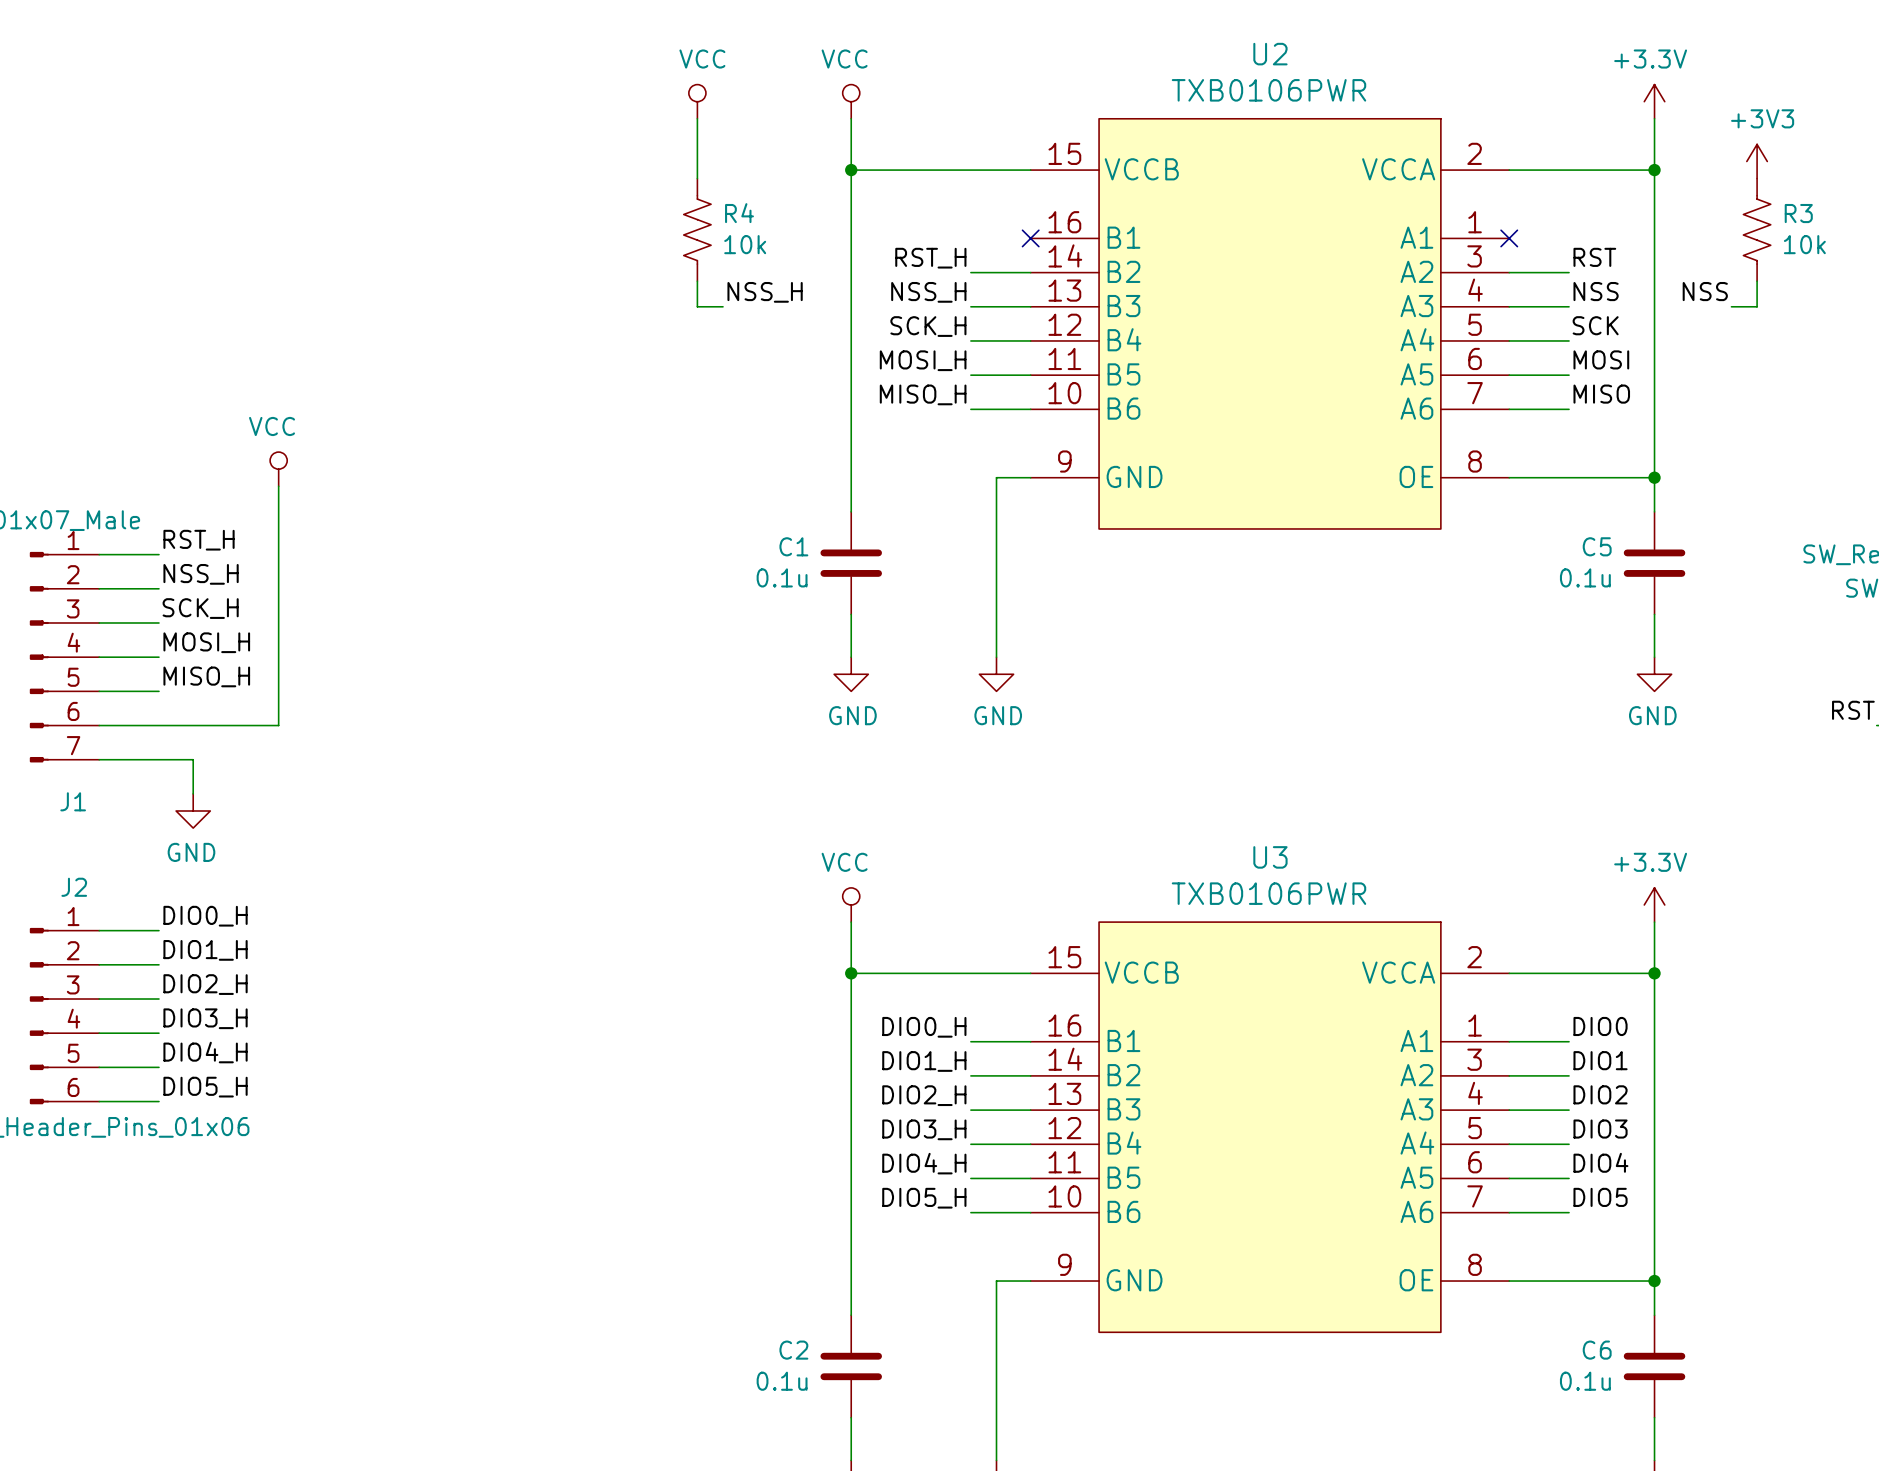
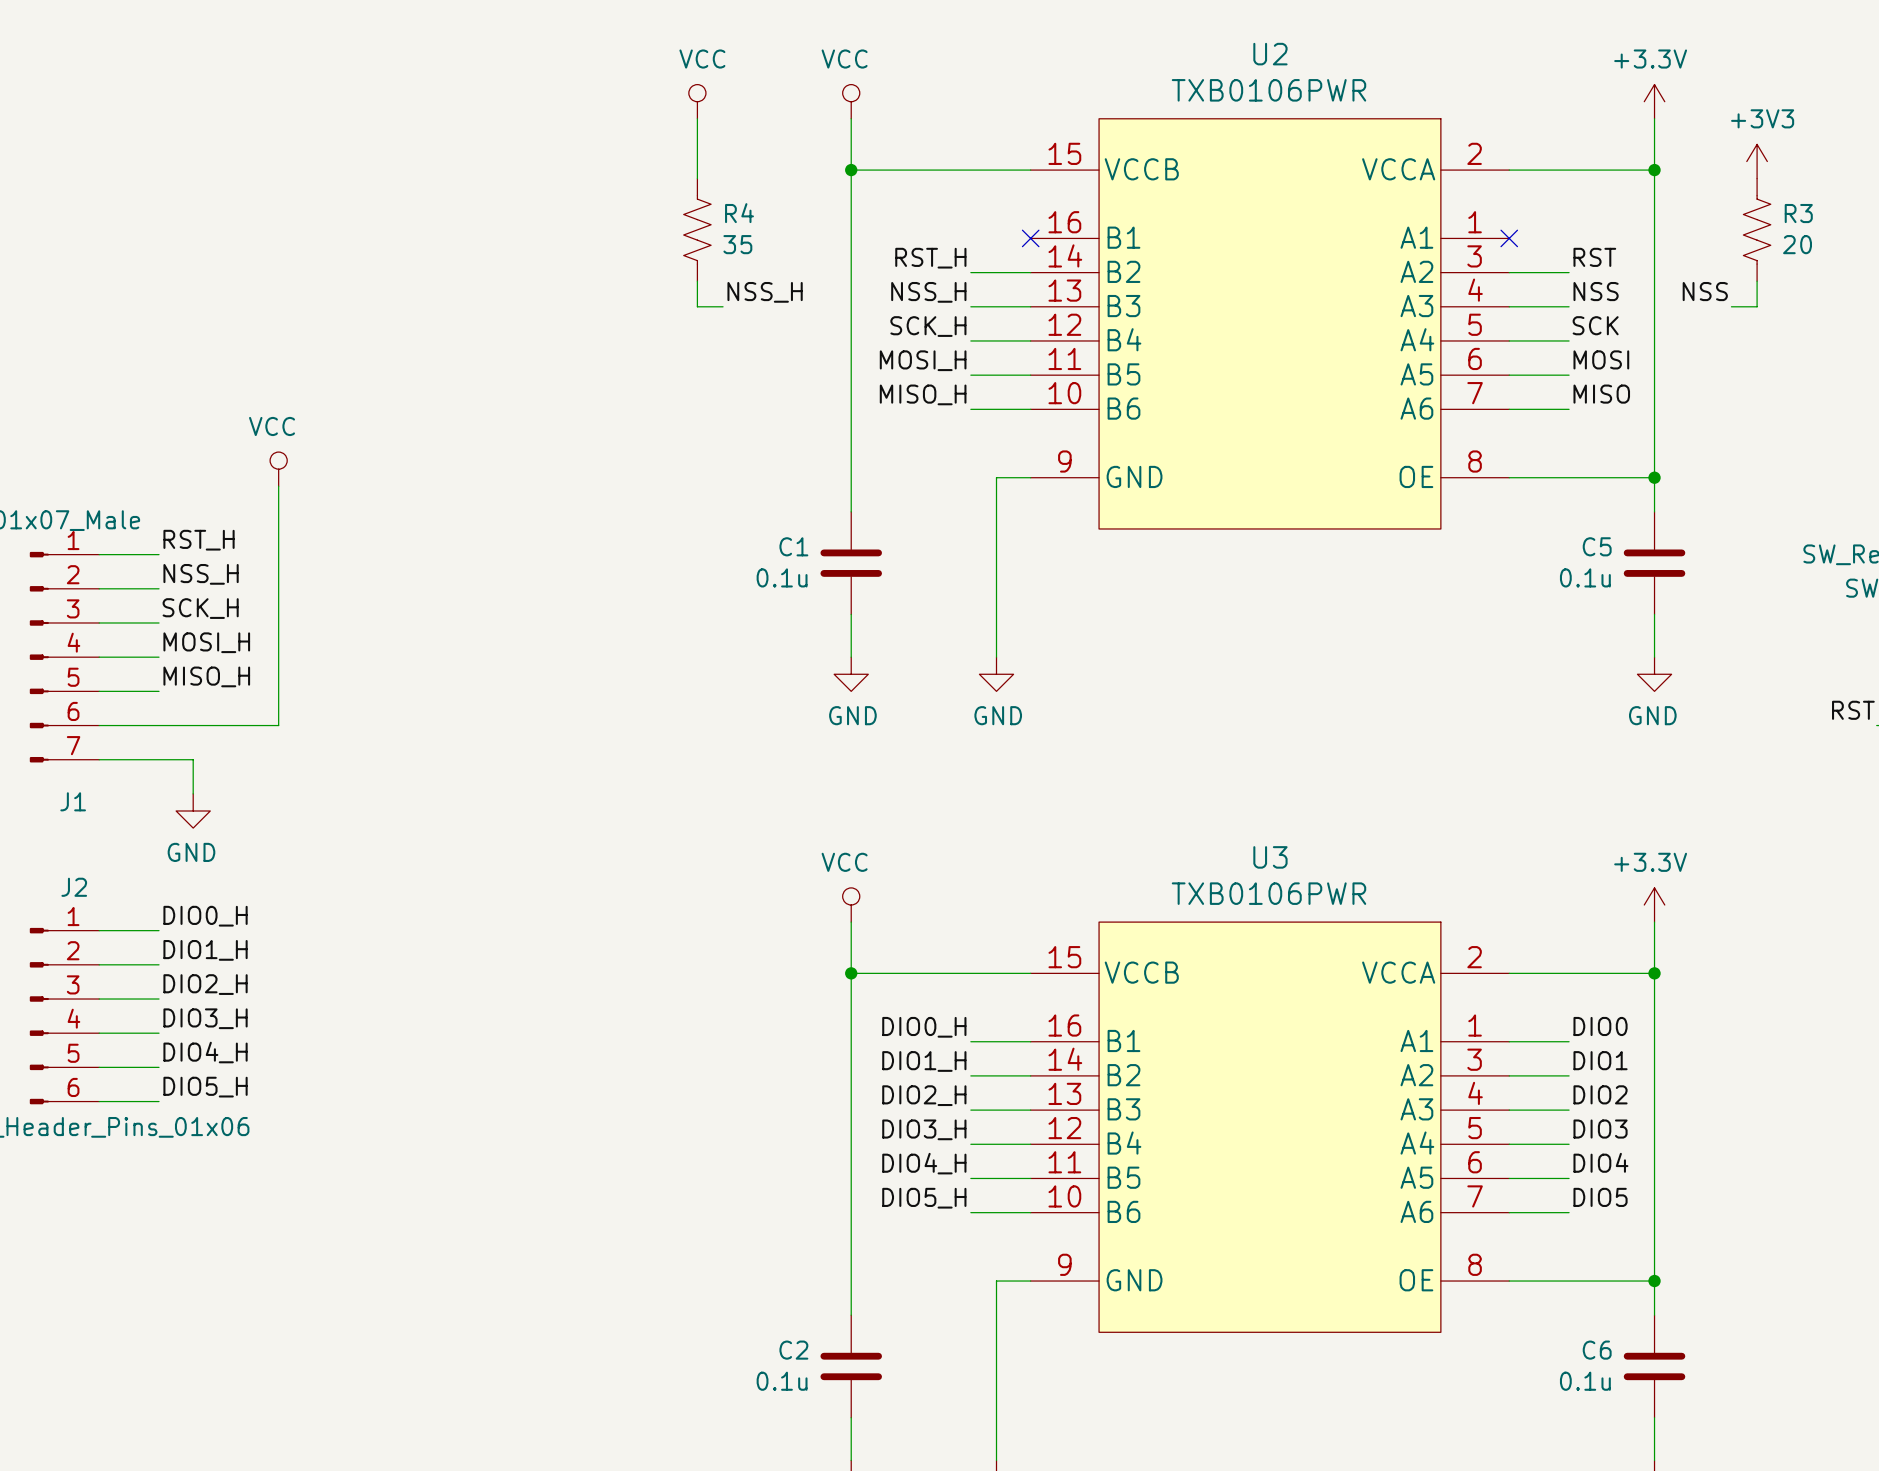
R4 value: 10k (745, 244) -> 35 (737, 244)
R3 value: 10k (1804, 244) -> 20 (1797, 244)

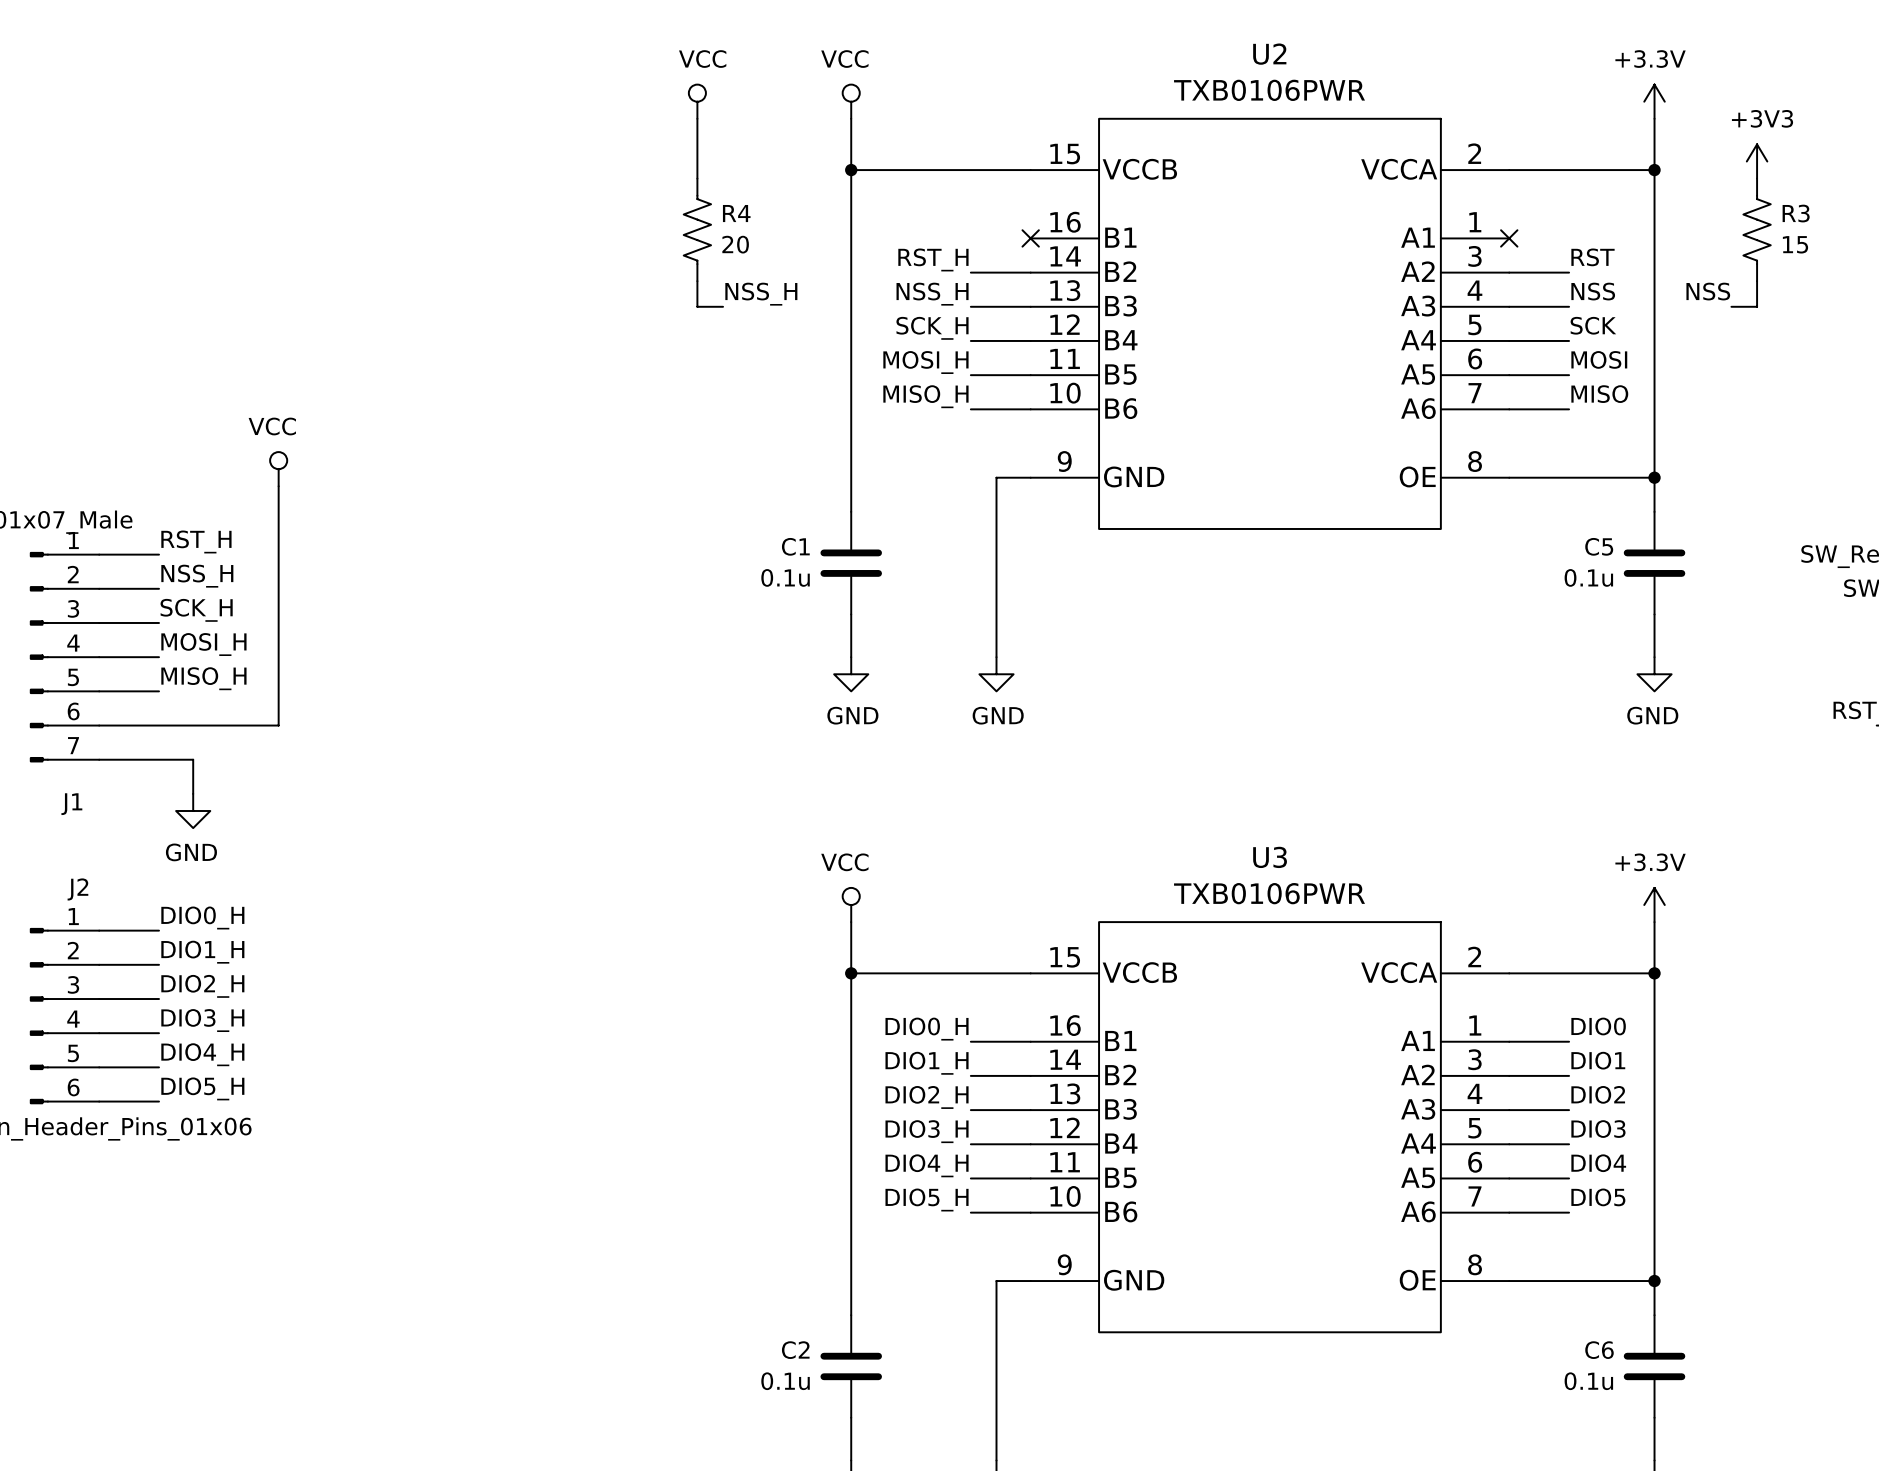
R4 value: 35 (737, 244) -> 20 (735, 244)
R3 value: 20 (1797, 244) -> 15 (1795, 244)

